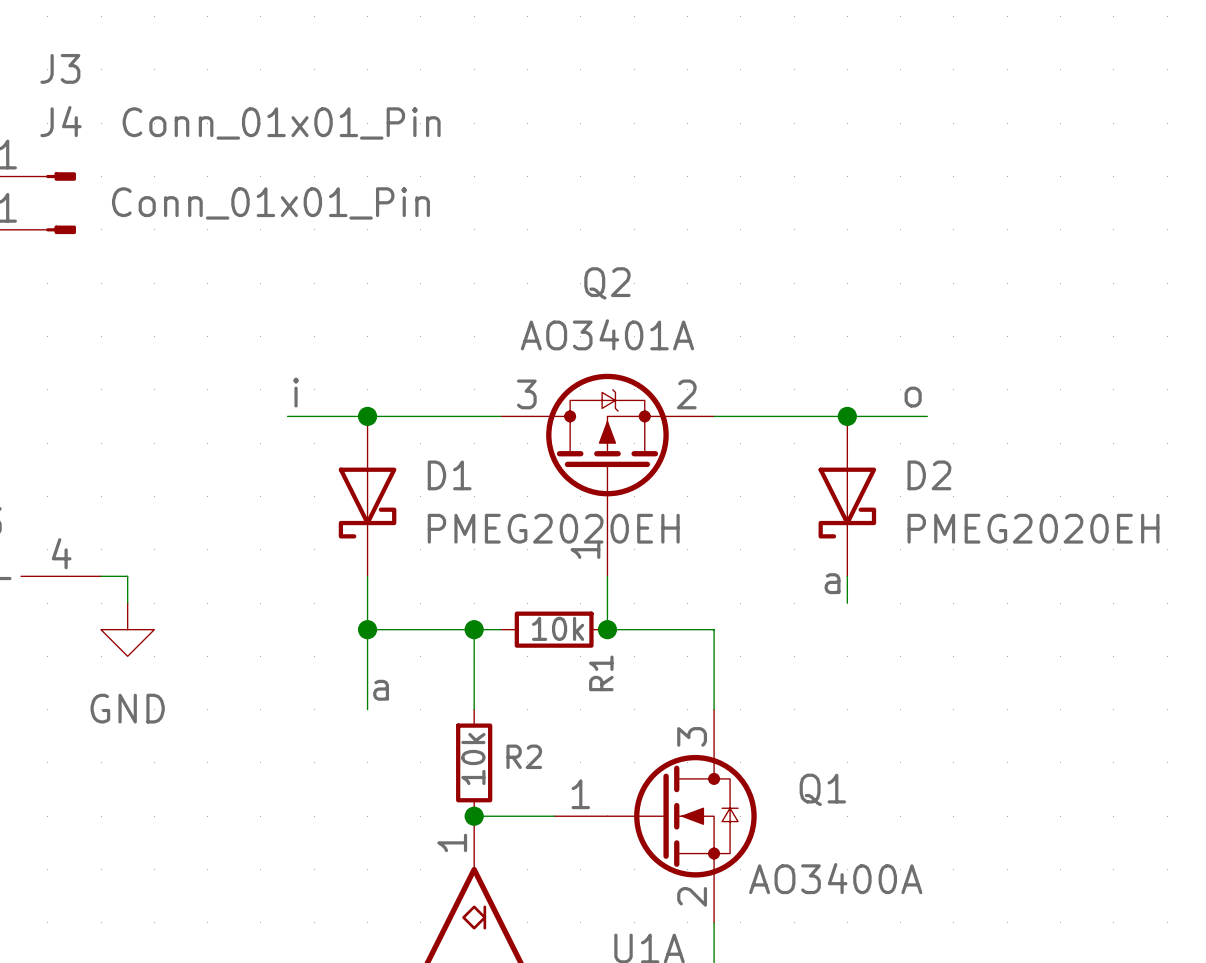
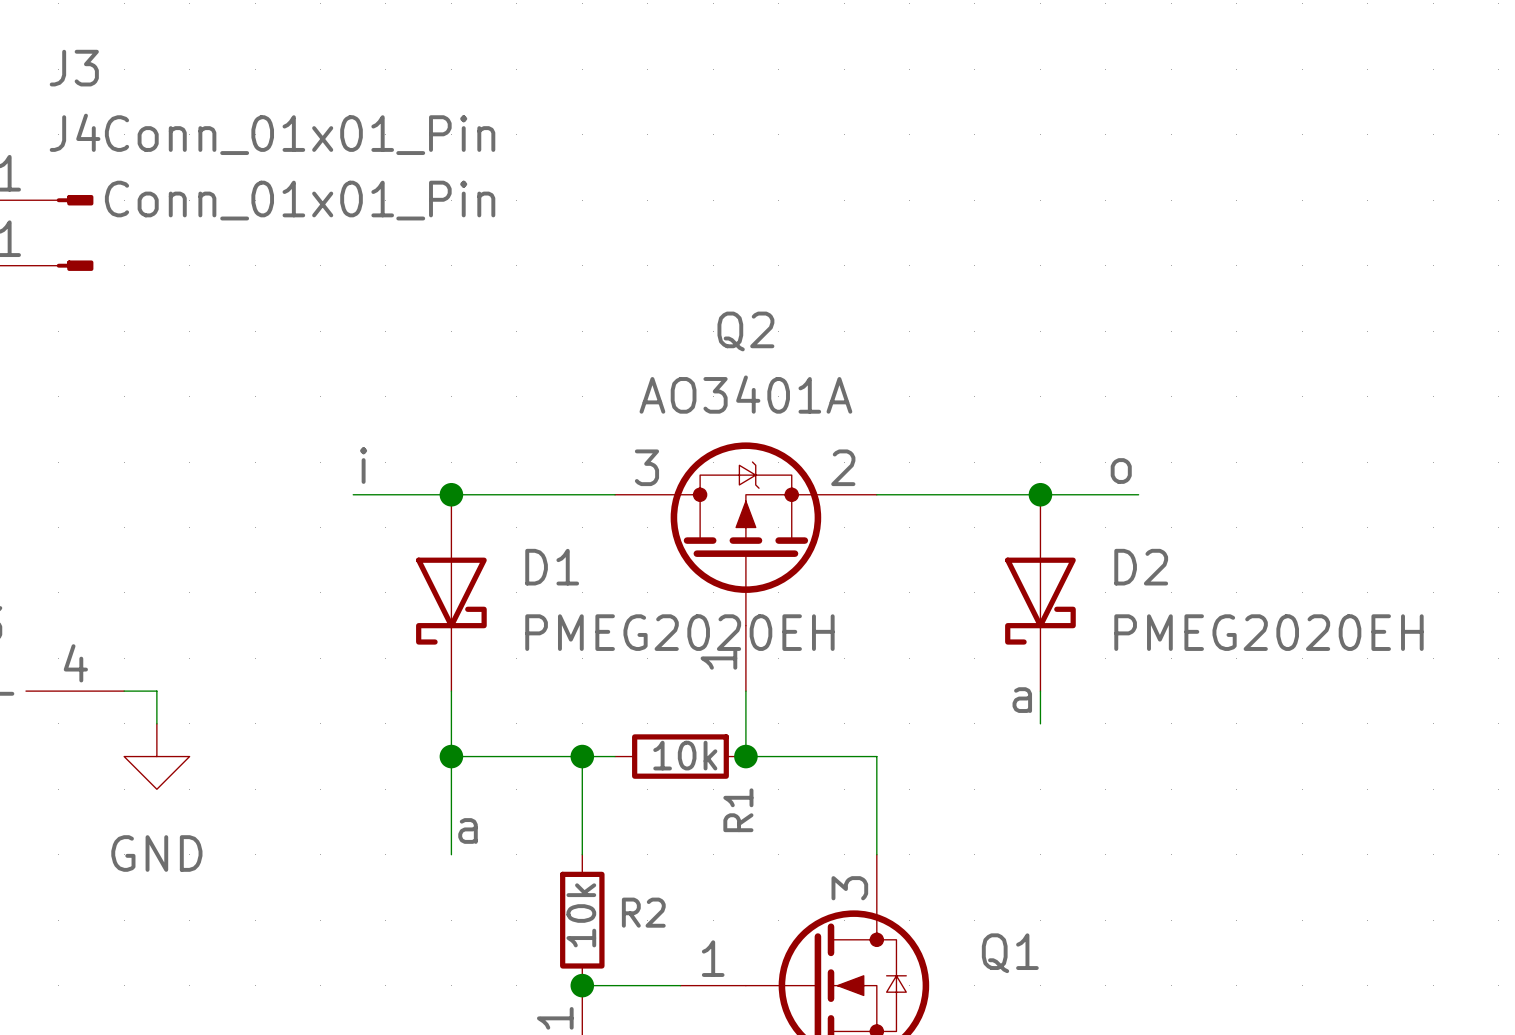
J3 value position: Conn_01x01_Pin (281, 123) -> Conn_01x01_Pin (300, 135)
J4 value position: Conn_01x01_Pin (270, 203) -> Conn_01x01_Pin (300, 200)

